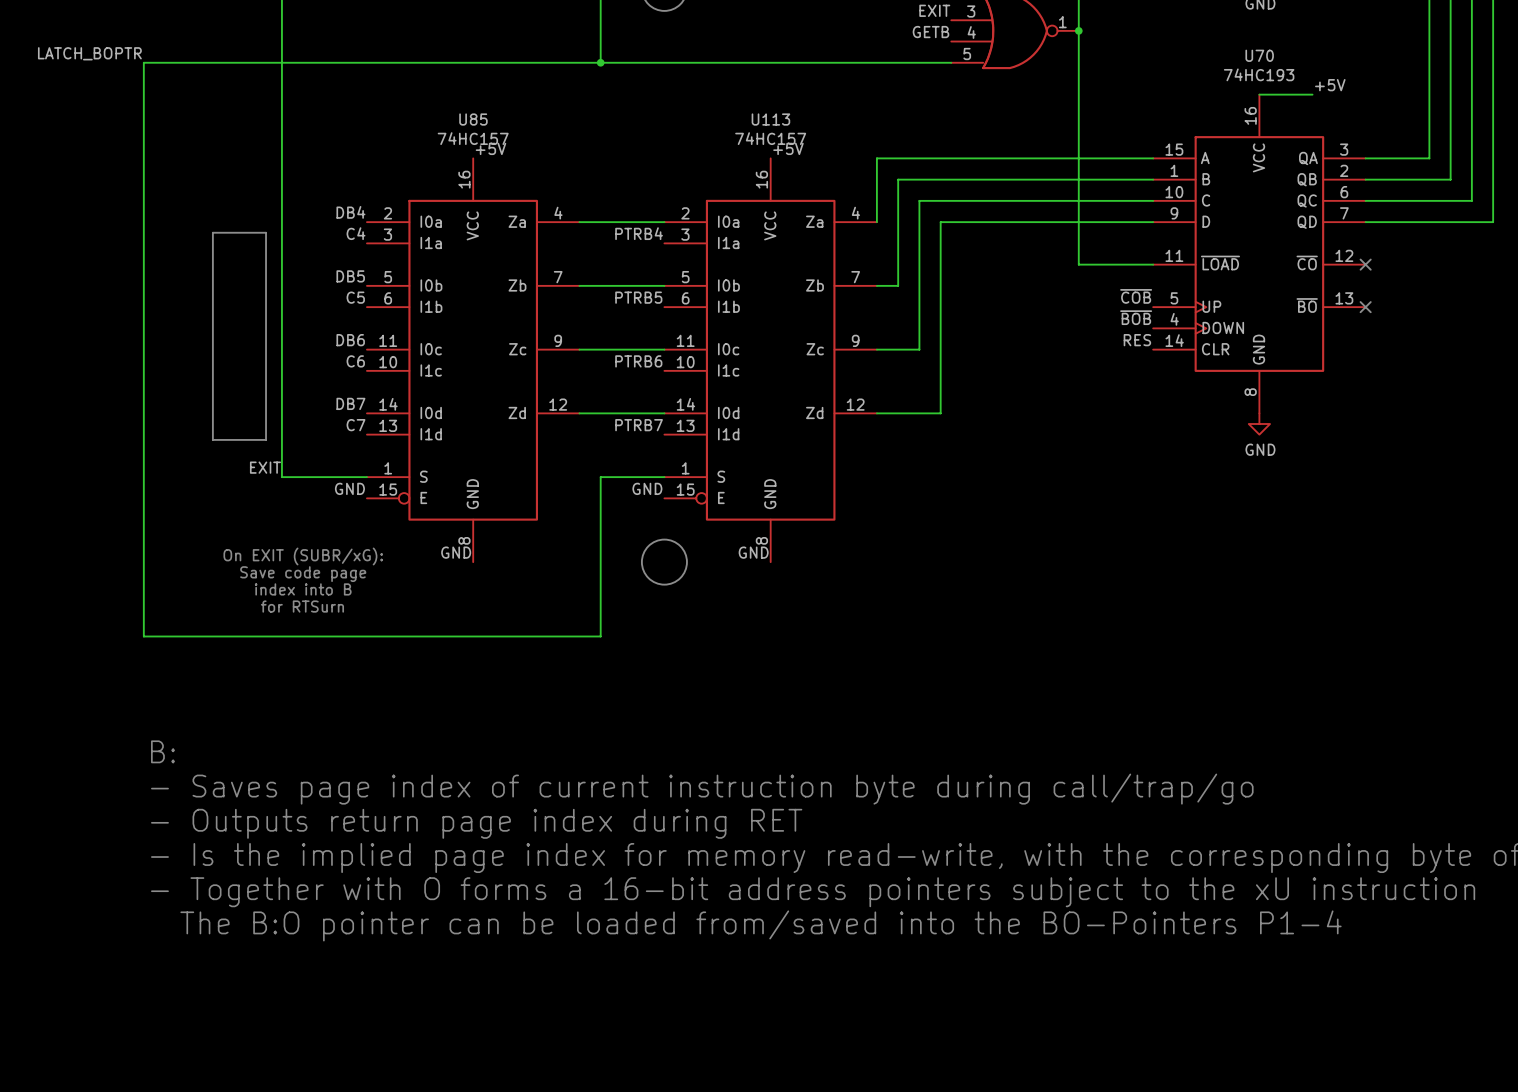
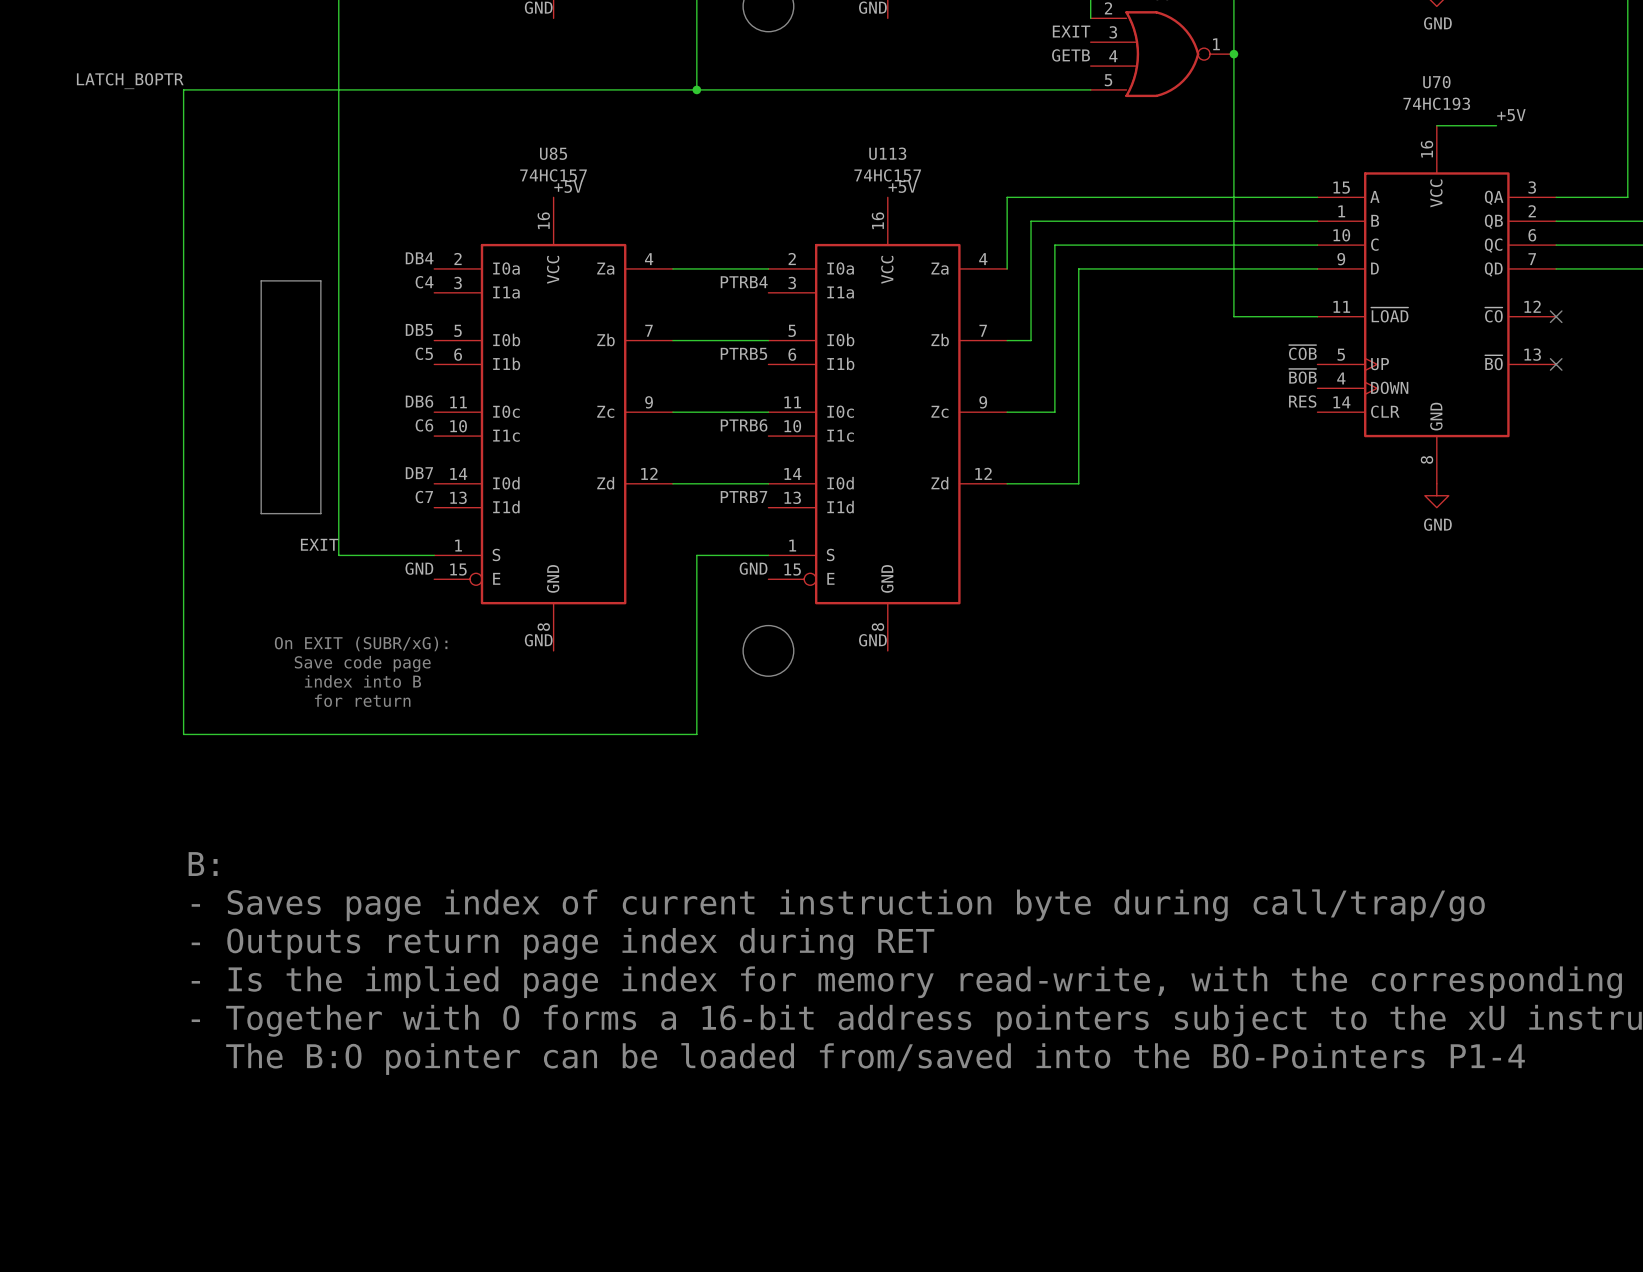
text: for RTSurn (302, 606) -> for return (362, 700)

